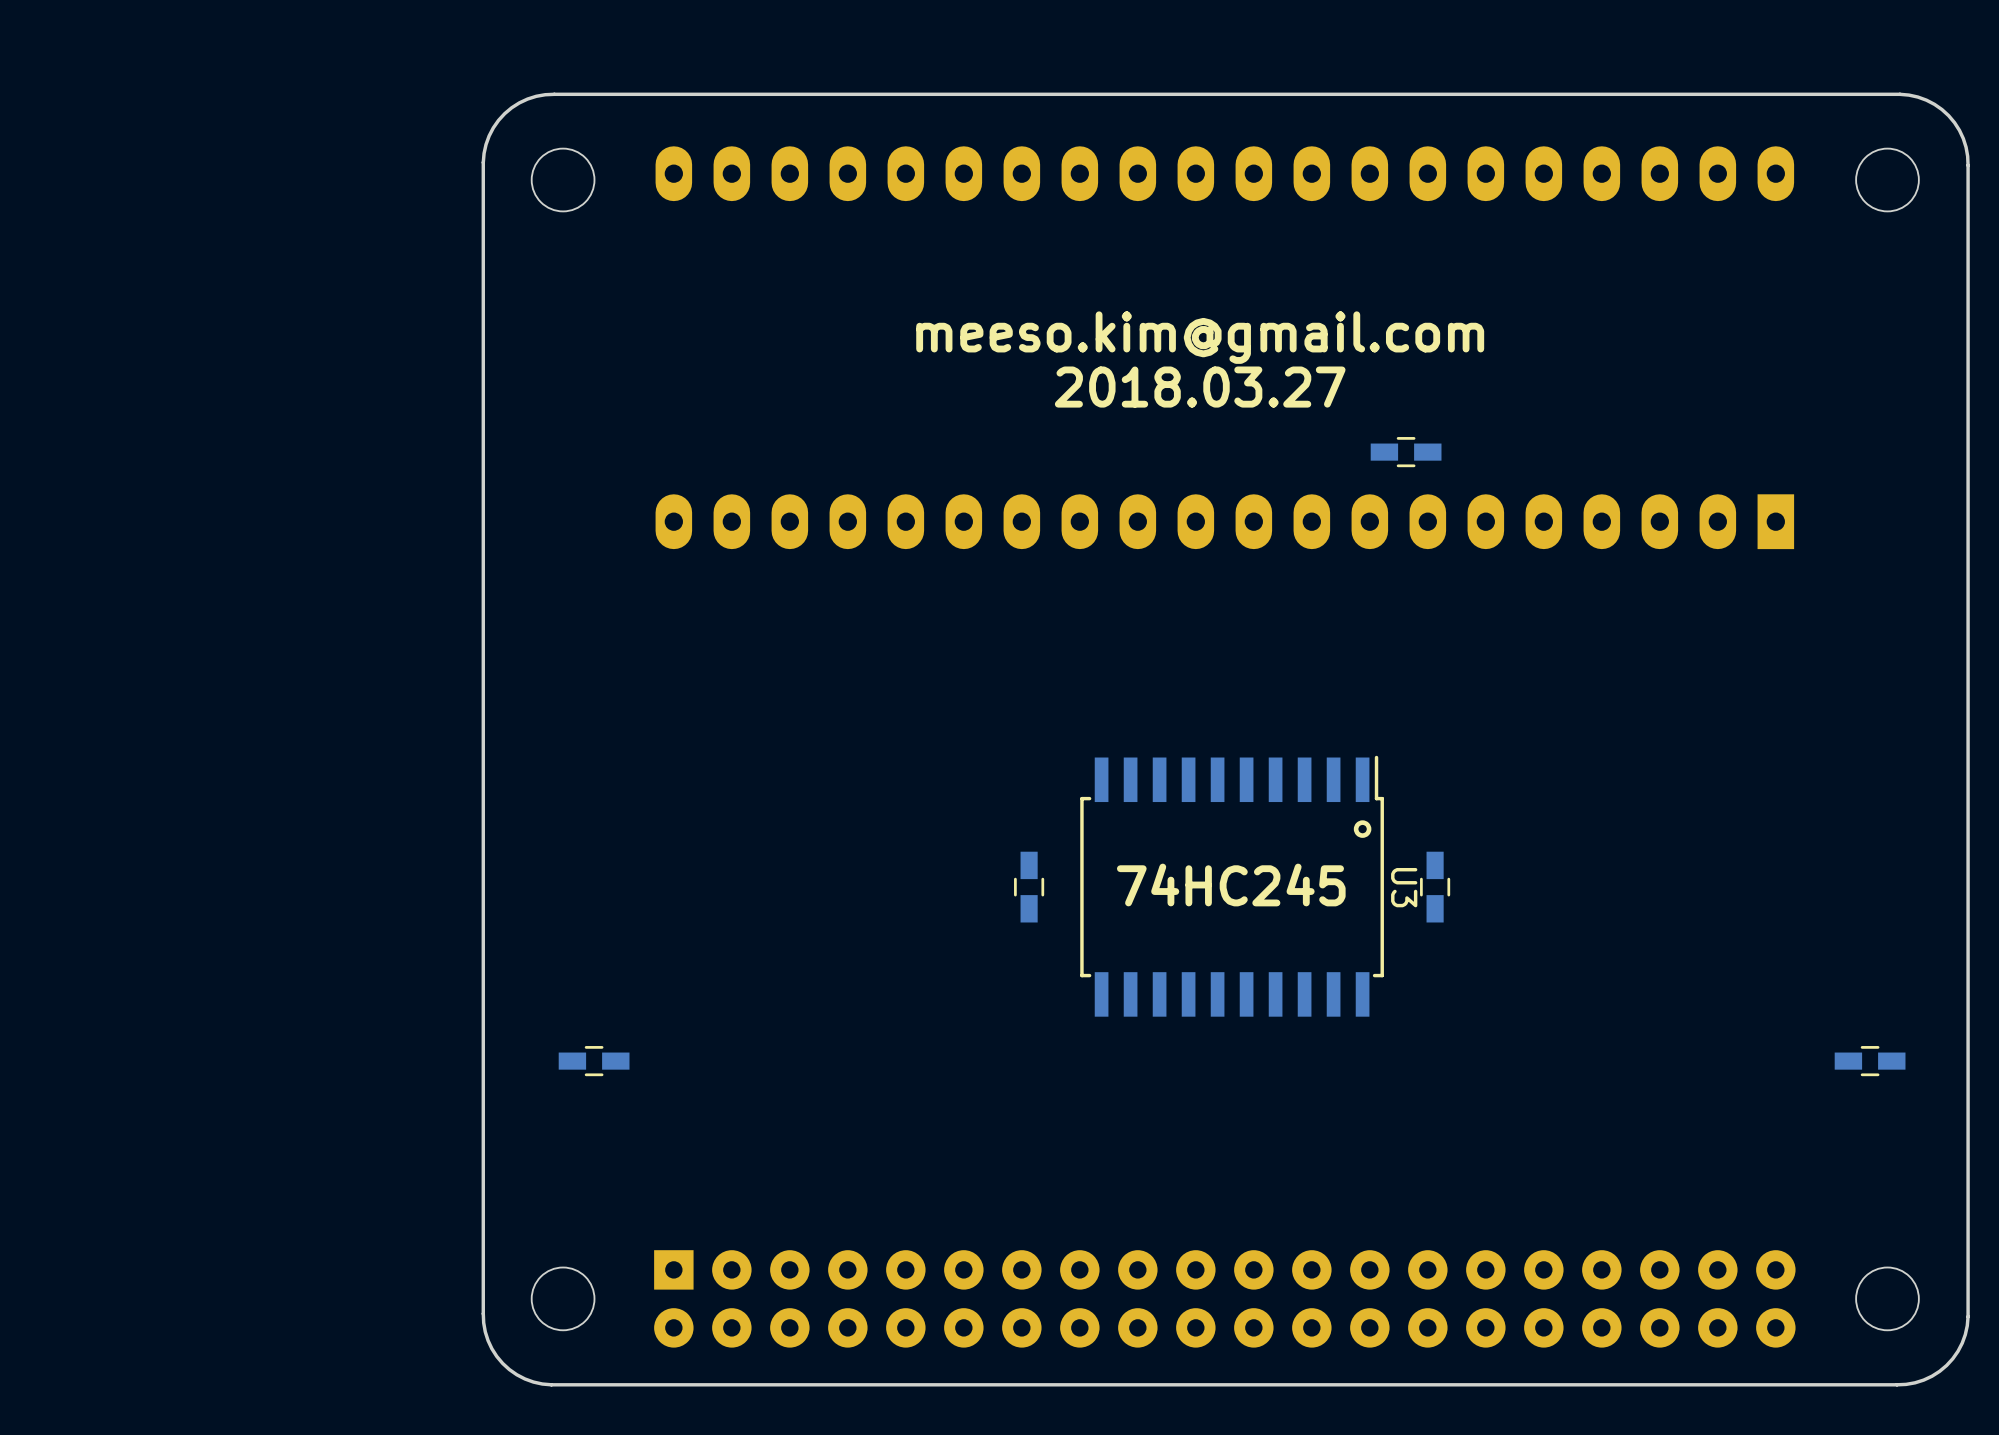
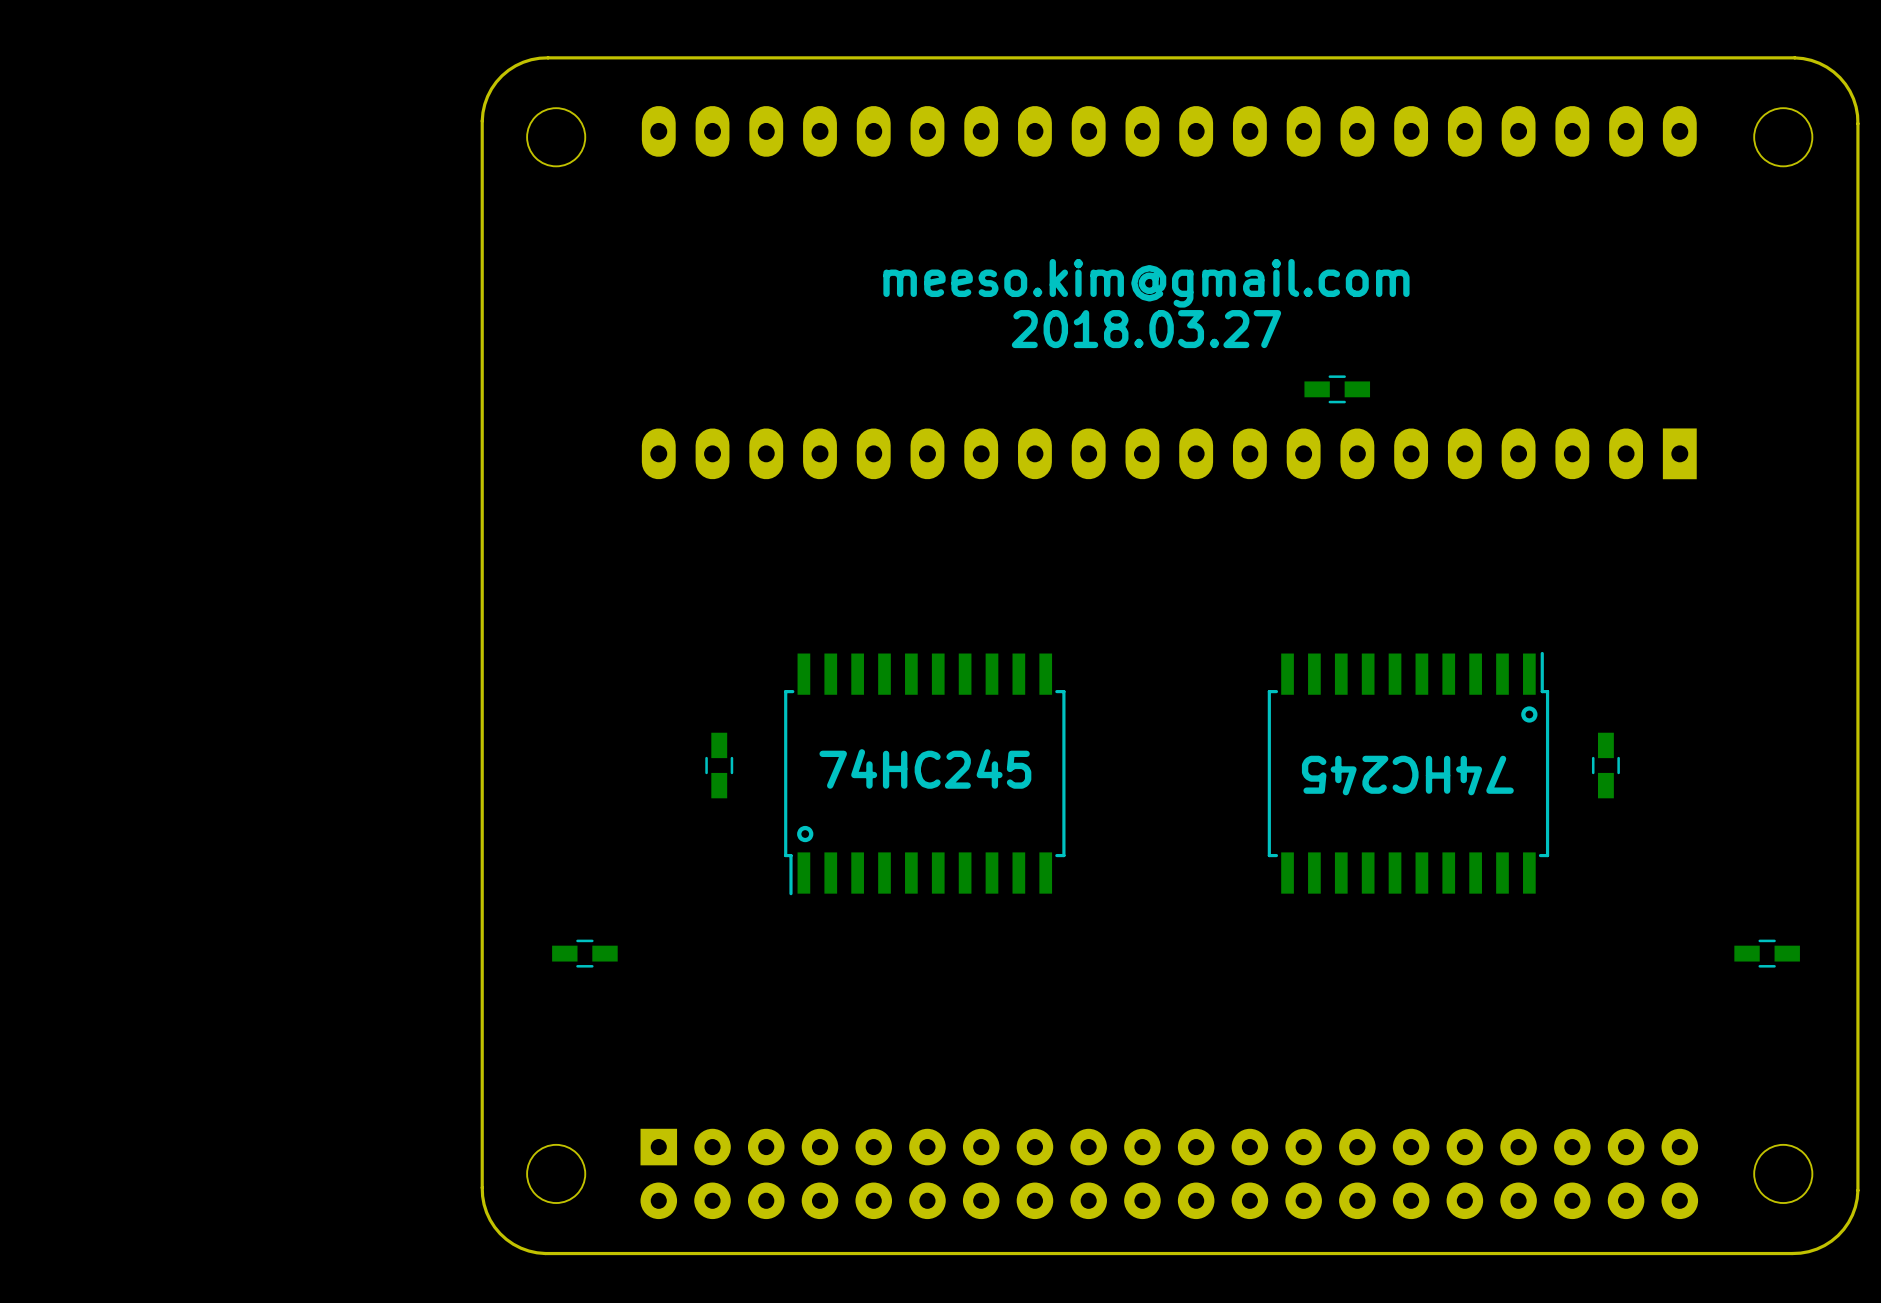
drawing position: (1362, 829) -> (1529, 714)
text: none -> 74HC245 (925, 768)
part: none -> (1408, 772)
part: none -> (924, 774)
text rotation: 0° (1231, 885) -> 180° (1407, 775)
U3: (1232, 886) -> none
part position: (1029, 887) -> (719, 765)
part position: (1435, 887) -> (1605, 765)
drawing: none -> [797, 825, 814, 843]

